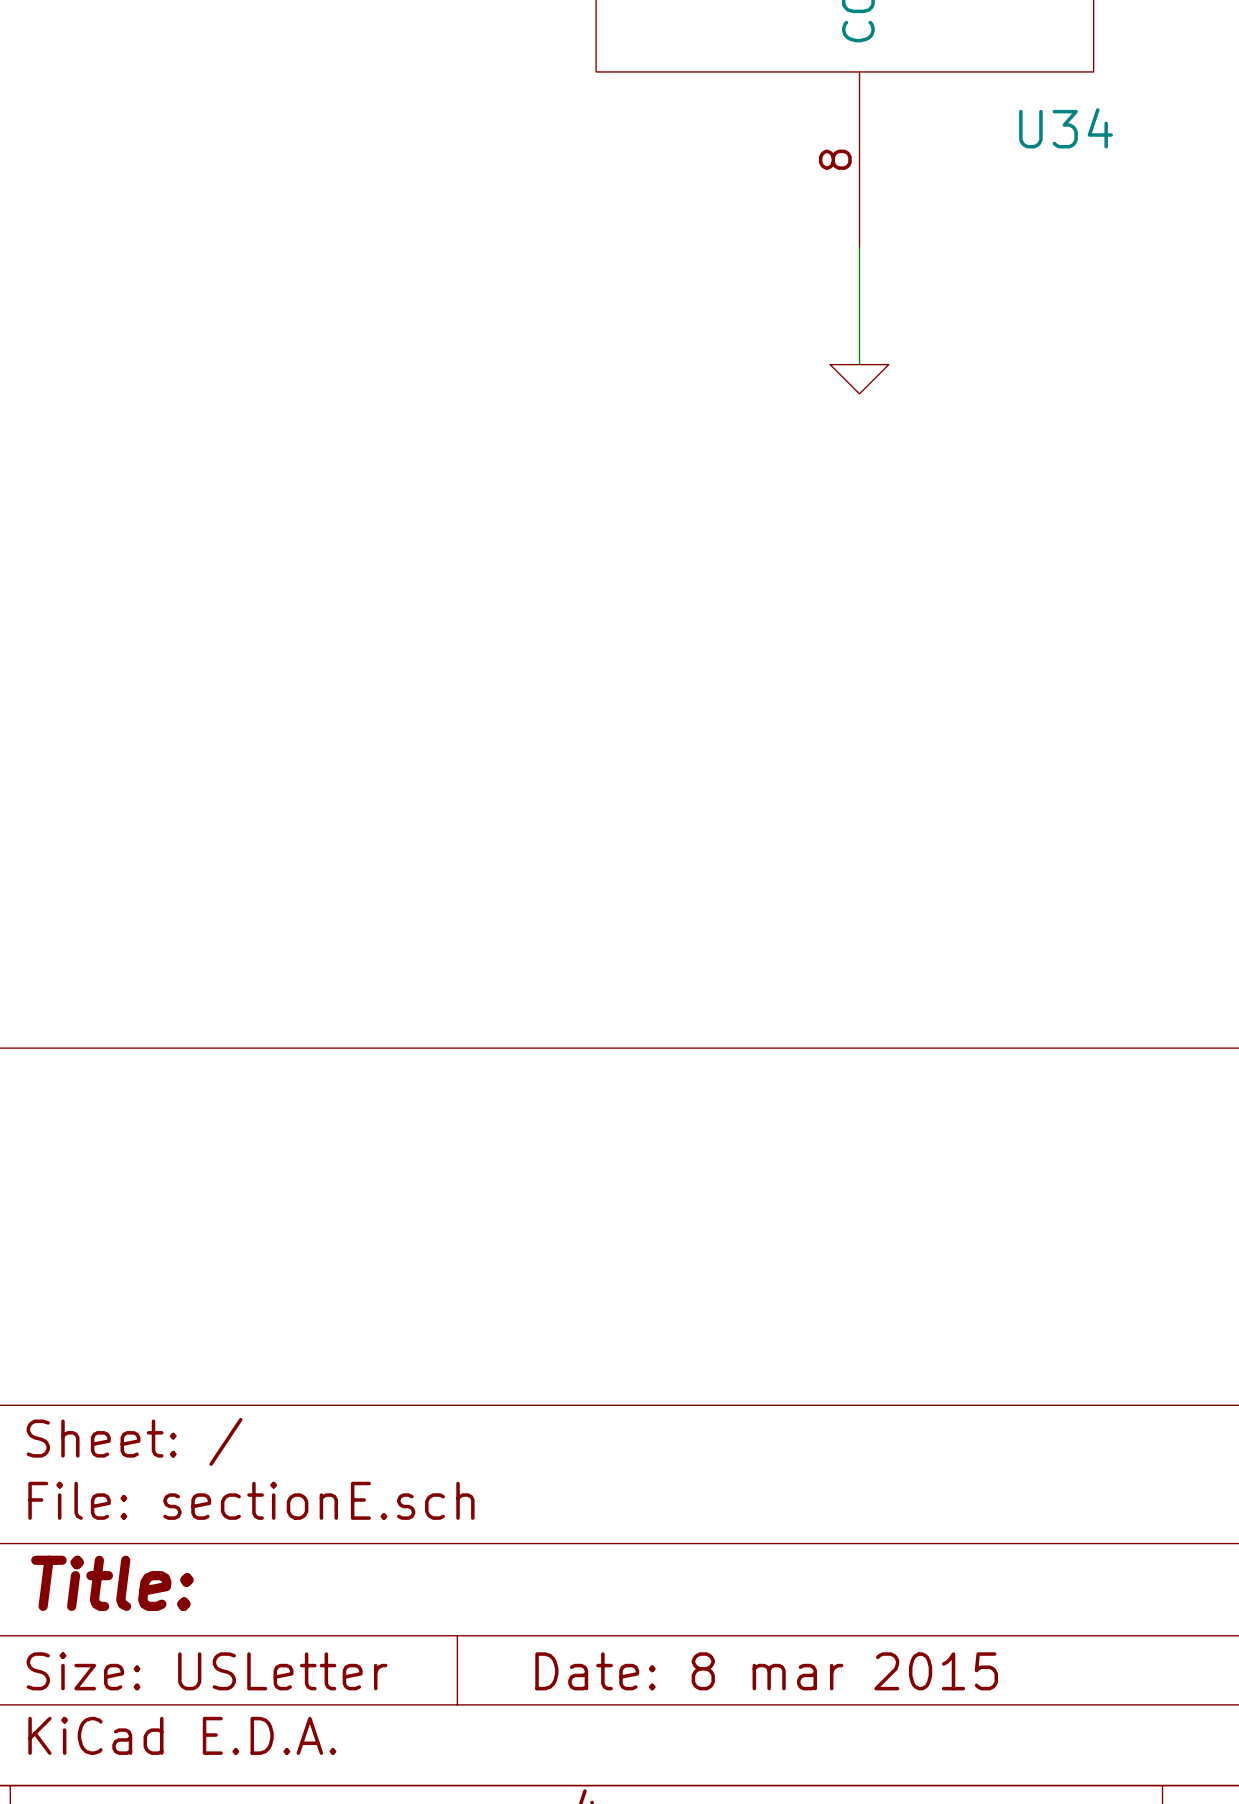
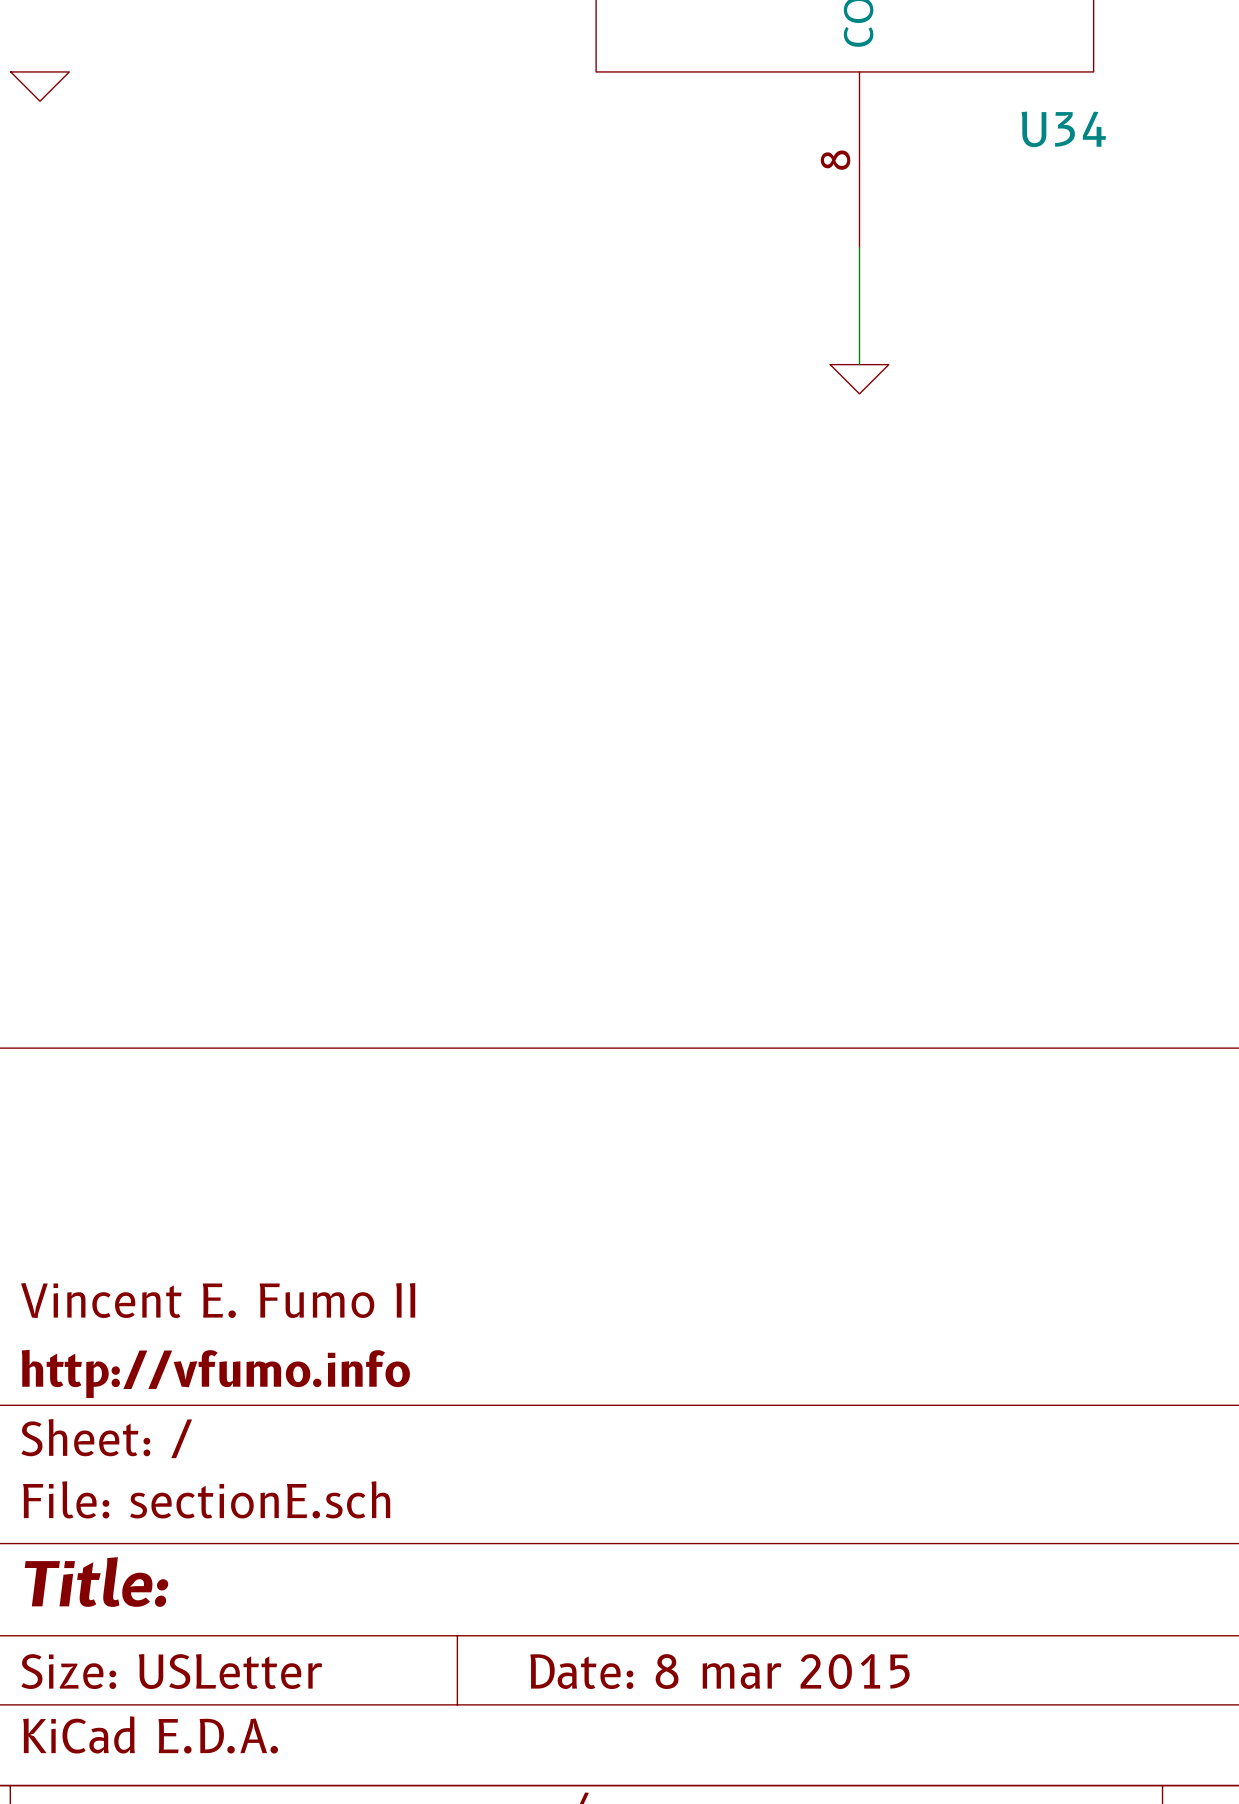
power symbol: none -> (40, 86)
title block: none -> Vincent E. Fumo II (218, 1300)
title block: none -> http://vfumo.info (215, 1373)

